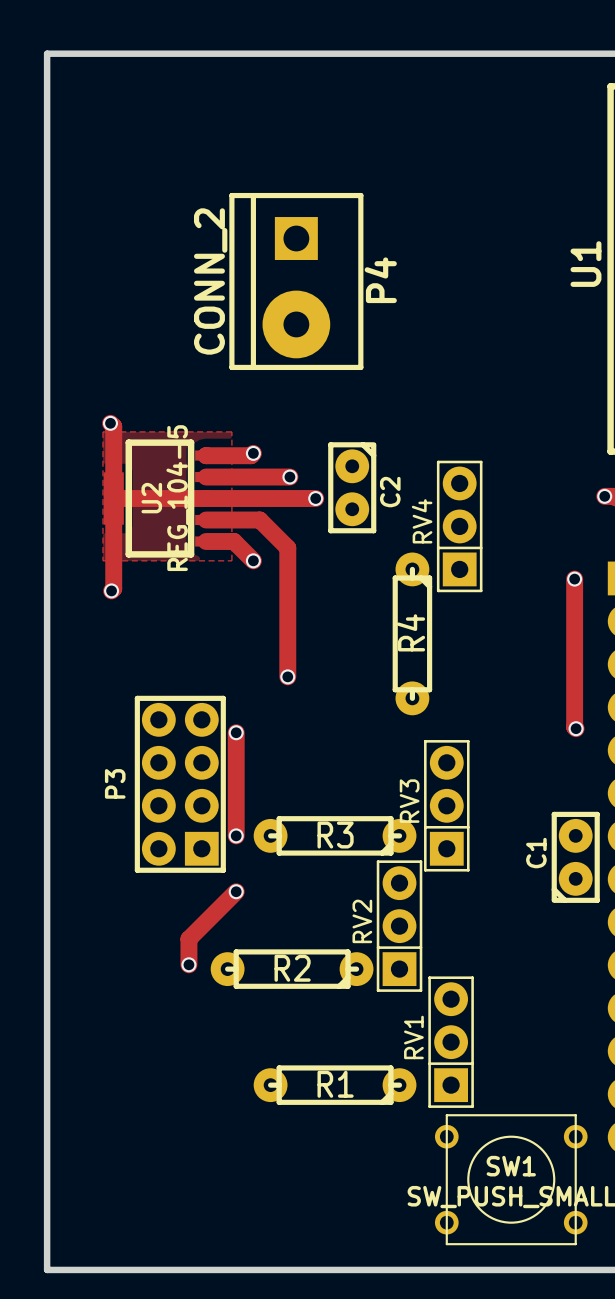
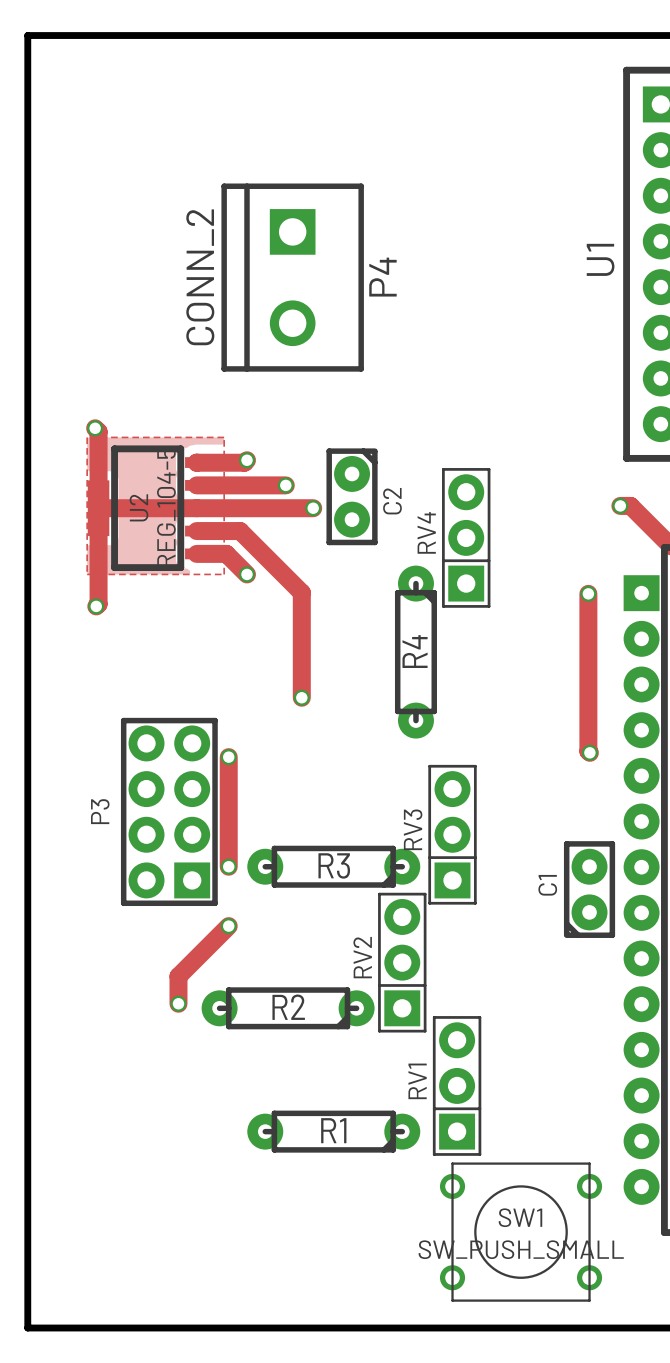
P4 footprint: [229, 192, 364, 371] -> [221, 183, 364, 372]
track: (246, 520) (259, 520) (287, 547) (287, 676) -> (240, 531) (301, 592) (301, 697)
via position: (287, 676) -> (301, 697)

